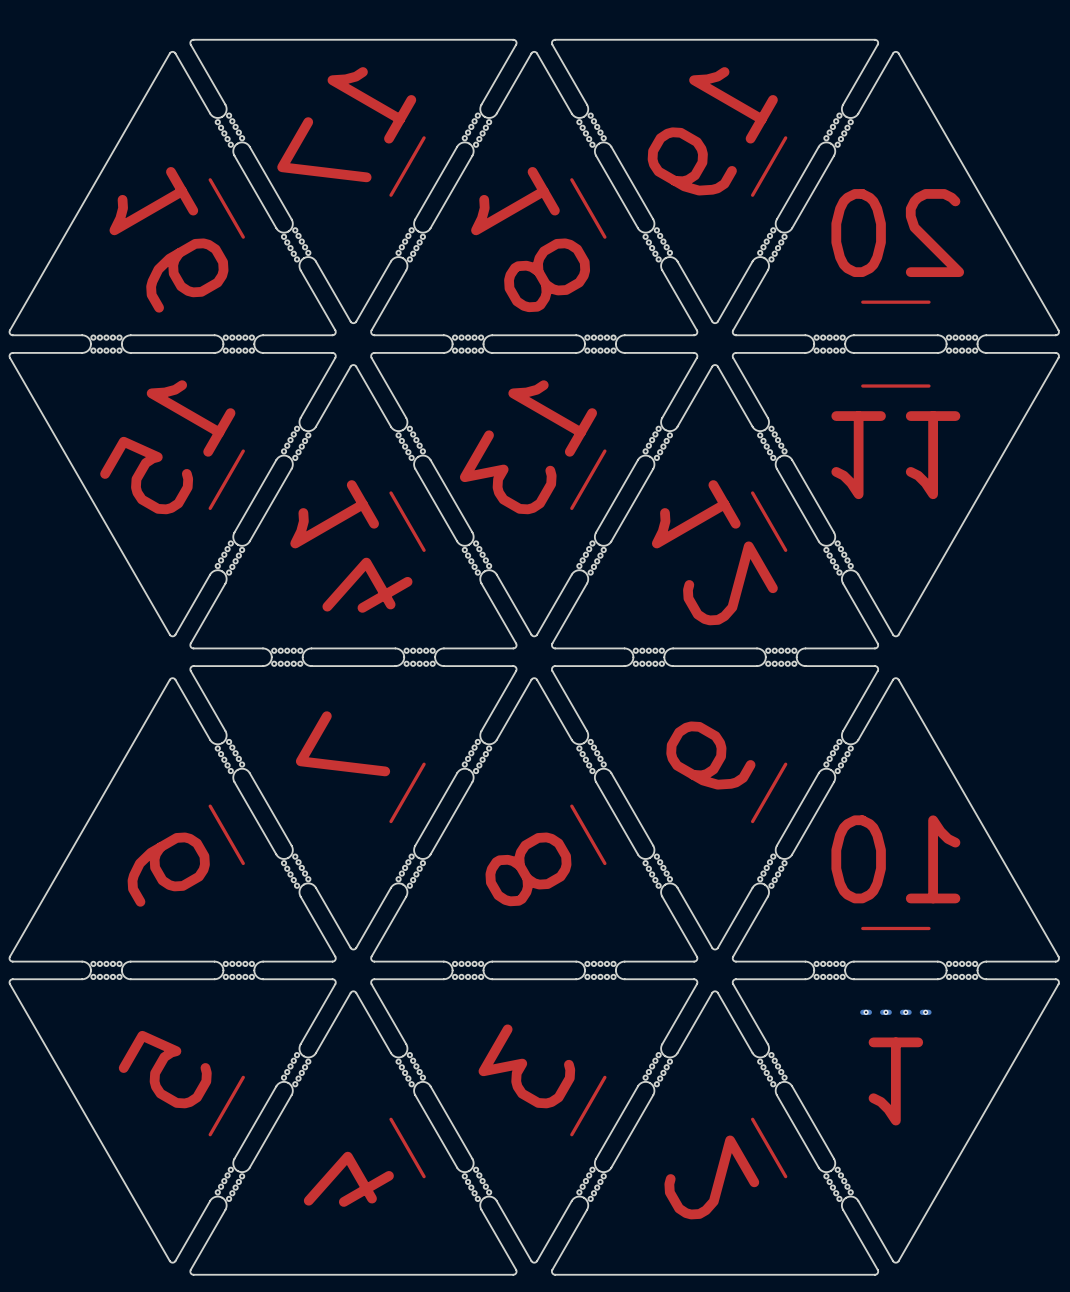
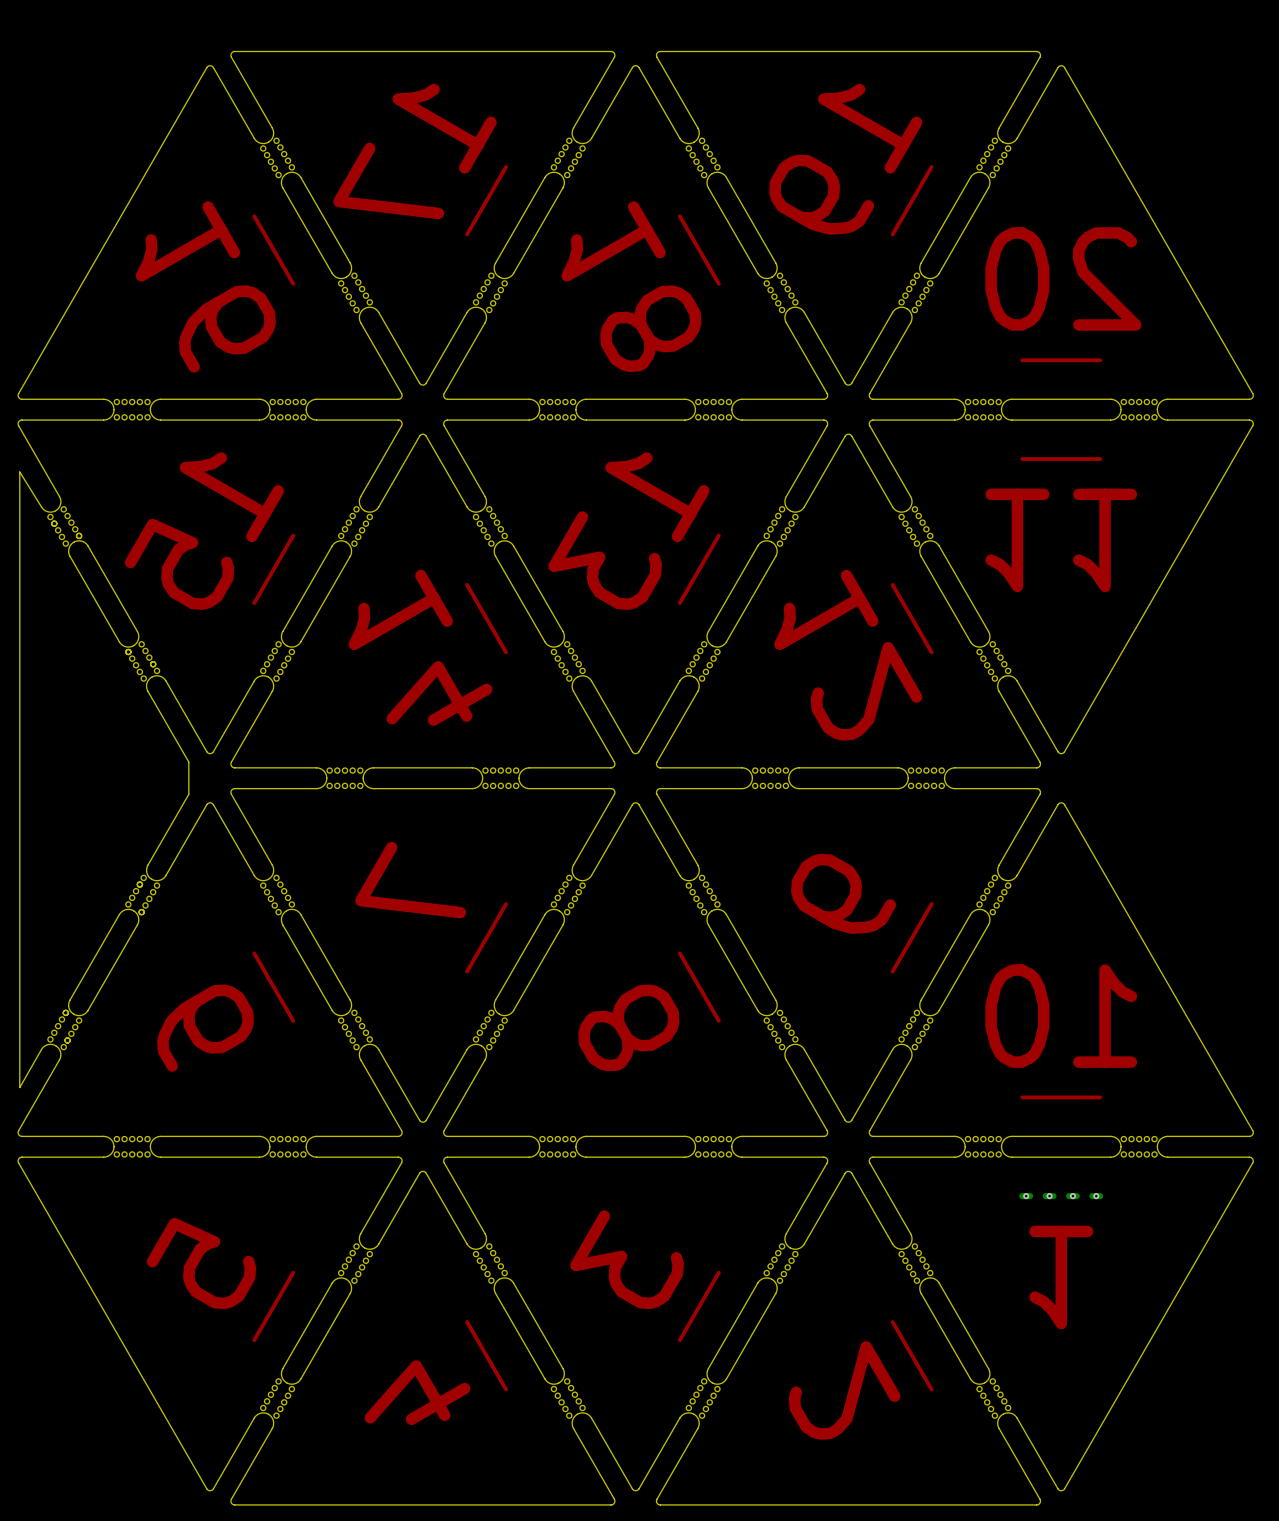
board edge: (44, 417) (68, 459) -> (137, 631) (138, 639) (134, 645) (127, 646) (121, 644) (70, 556) (69, 548) (73, 542) (81, 541) (88, 546)
board edge: none -> (59, 496) (60, 503) (57, 509) (51, 512) (45, 510) (19, 472) (19, 1087) (44, 1046) (50, 1044) (56, 1046) (60, 1052) (59, 1059)
part: none -> (54, 523)
part: none -> (71, 522)
part: none -> (58, 530)
part: none -> (79, 535)
board edge: (110, 532) (135, 574) -> (165, 875) (159, 880) (152, 879) (147, 875) (146, 868) (188, 794) (188, 762) (146, 688) (147, 680) (153, 676) (160, 676) (165, 680)
part: none -> (128, 651)
part: none -> (149, 657)
part: none -> (153, 664)
part: none -> (136, 665)
board edge: (135, 739) (110, 781) -> none
part: none -> (139, 884)
part: none -> (136, 891)
part: none -> (149, 898)
part: none -> (141, 912)
board edge: (68, 854) (44, 896) -> (88, 1010) (81, 1015) (74, 1014) (69, 1009) (69, 1002) (119, 914) (125, 909) (133, 910) (138, 917) (137, 924)
part: none -> (65, 1012)
part: none -> (58, 1026)
part: none -> (71, 1033)
part: none -> (67, 1040)

